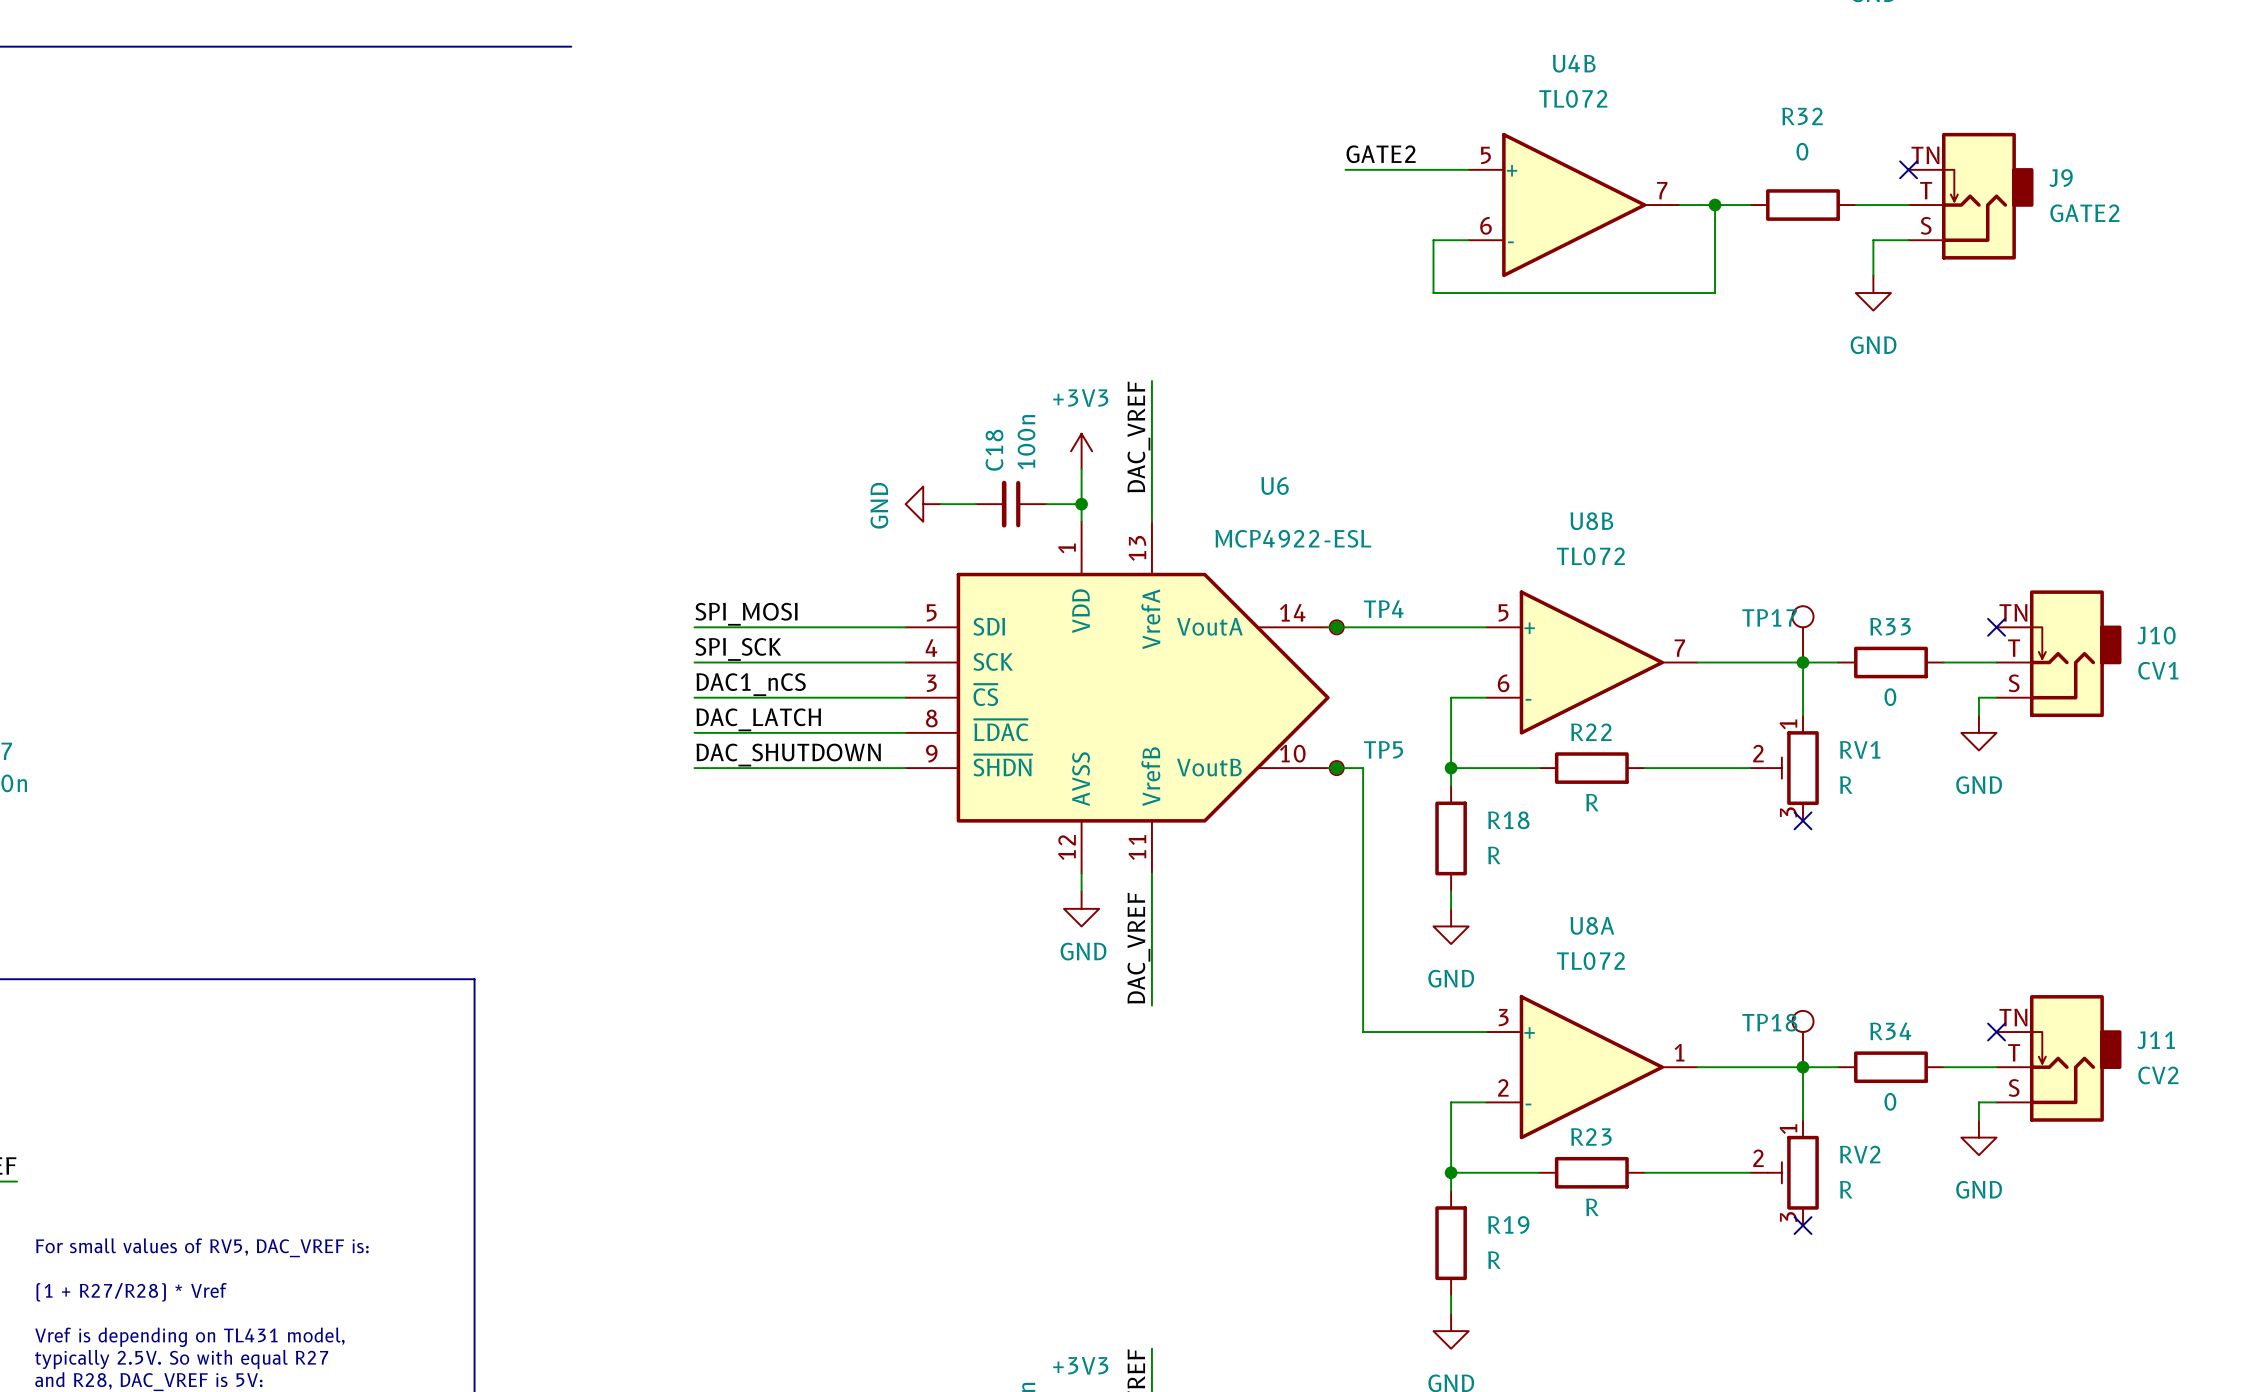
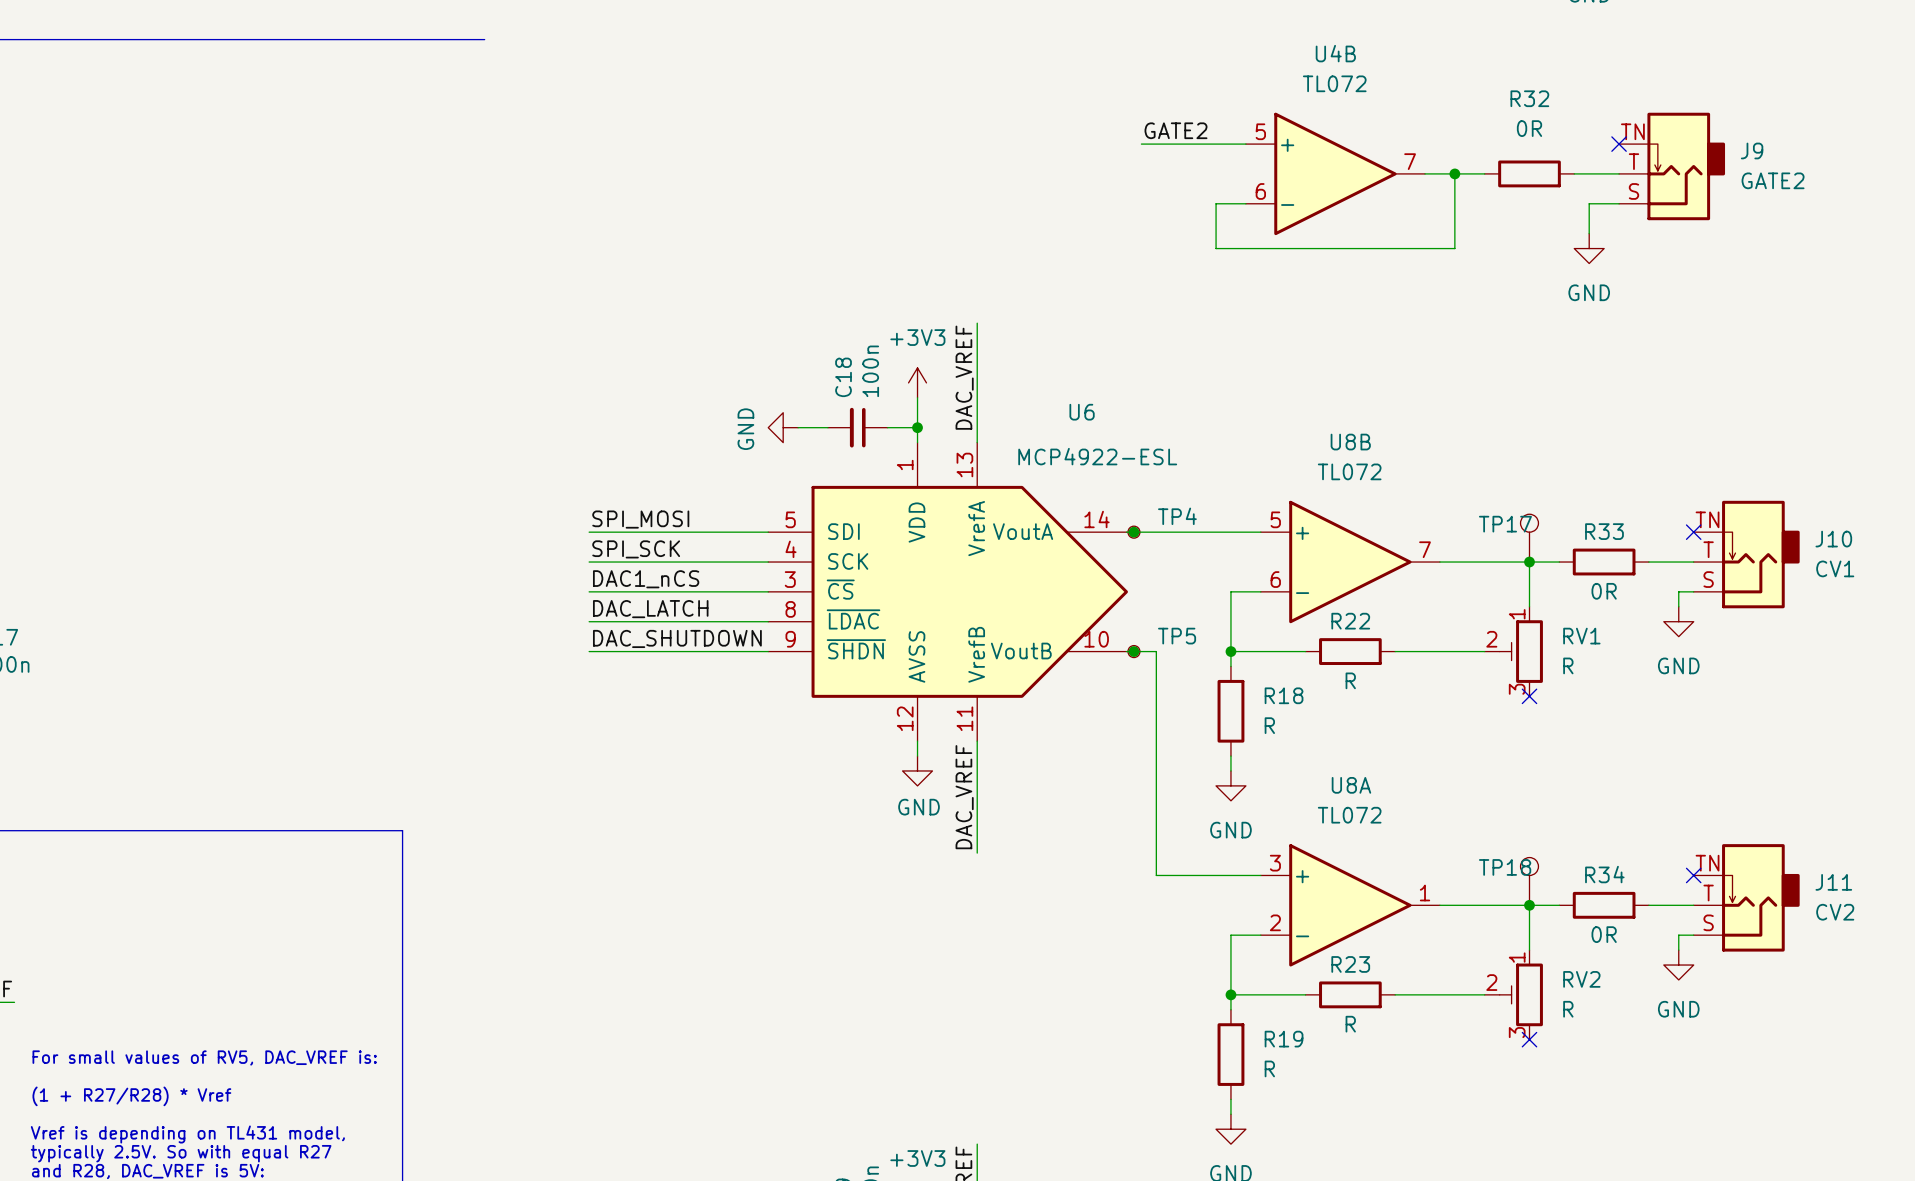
R32 value: 0 (1802, 151) -> 0R (1529, 128)
R33 value: 0 (1890, 697) -> 0R (1604, 591)
R34 value: 0 (1890, 1101) -> 0R (1604, 934)

